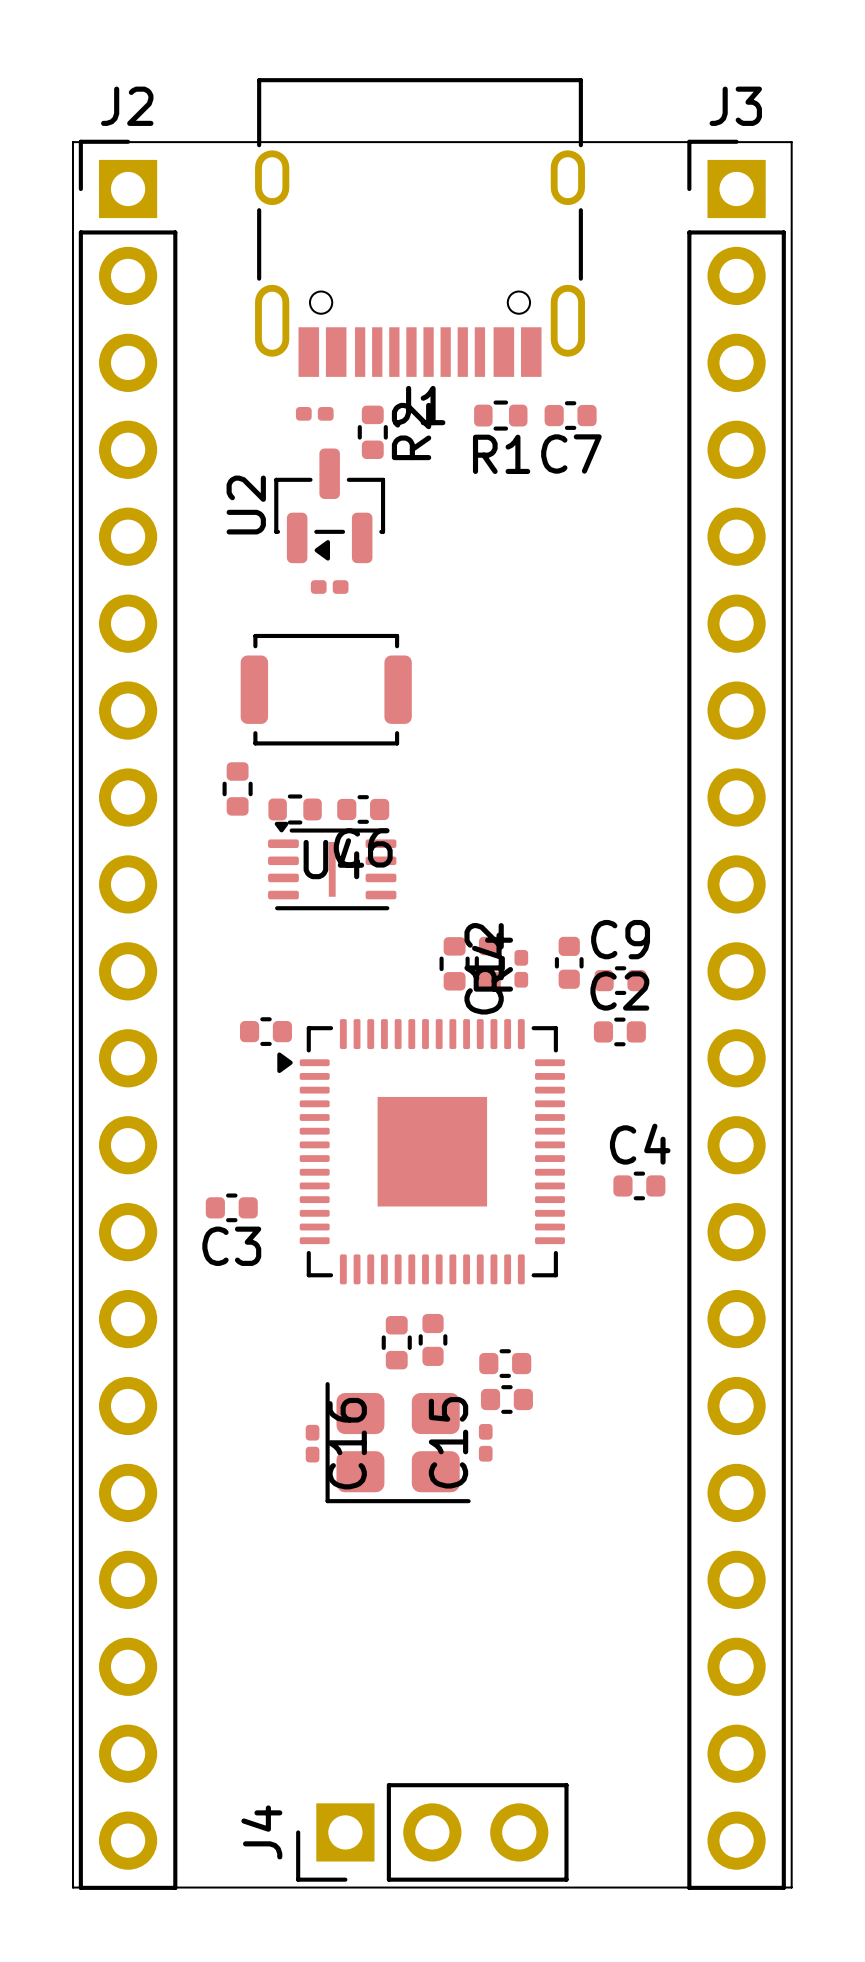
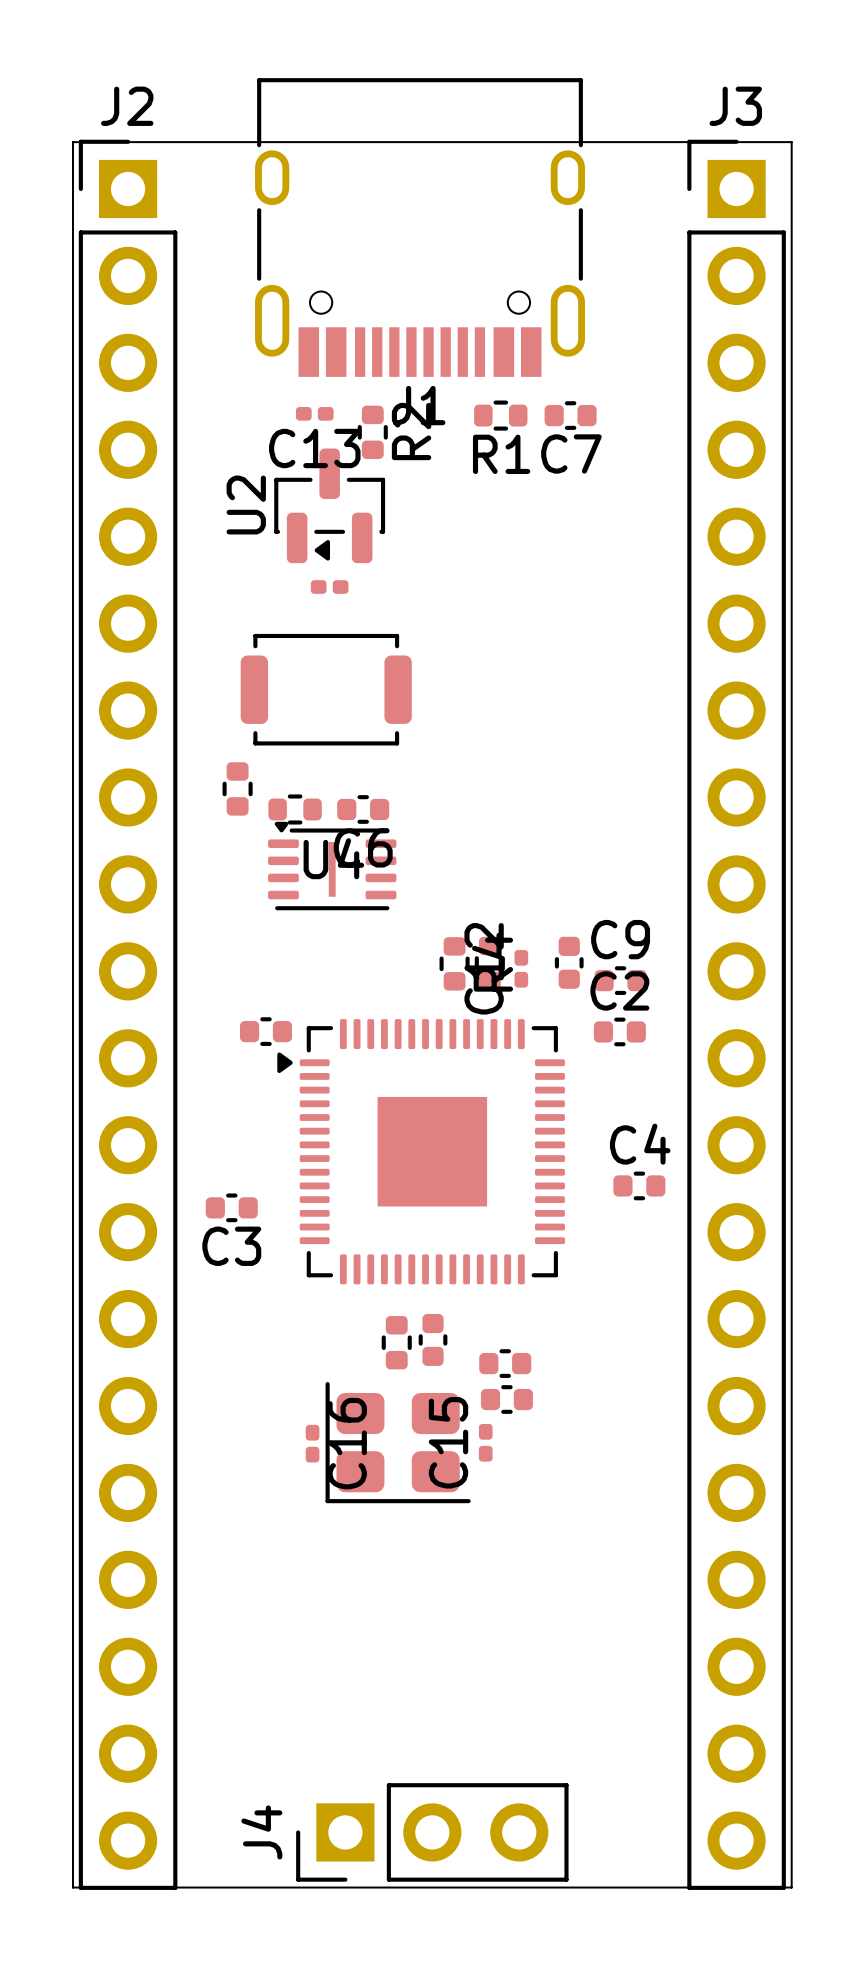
C13 name: none -> C13 (314, 448)

